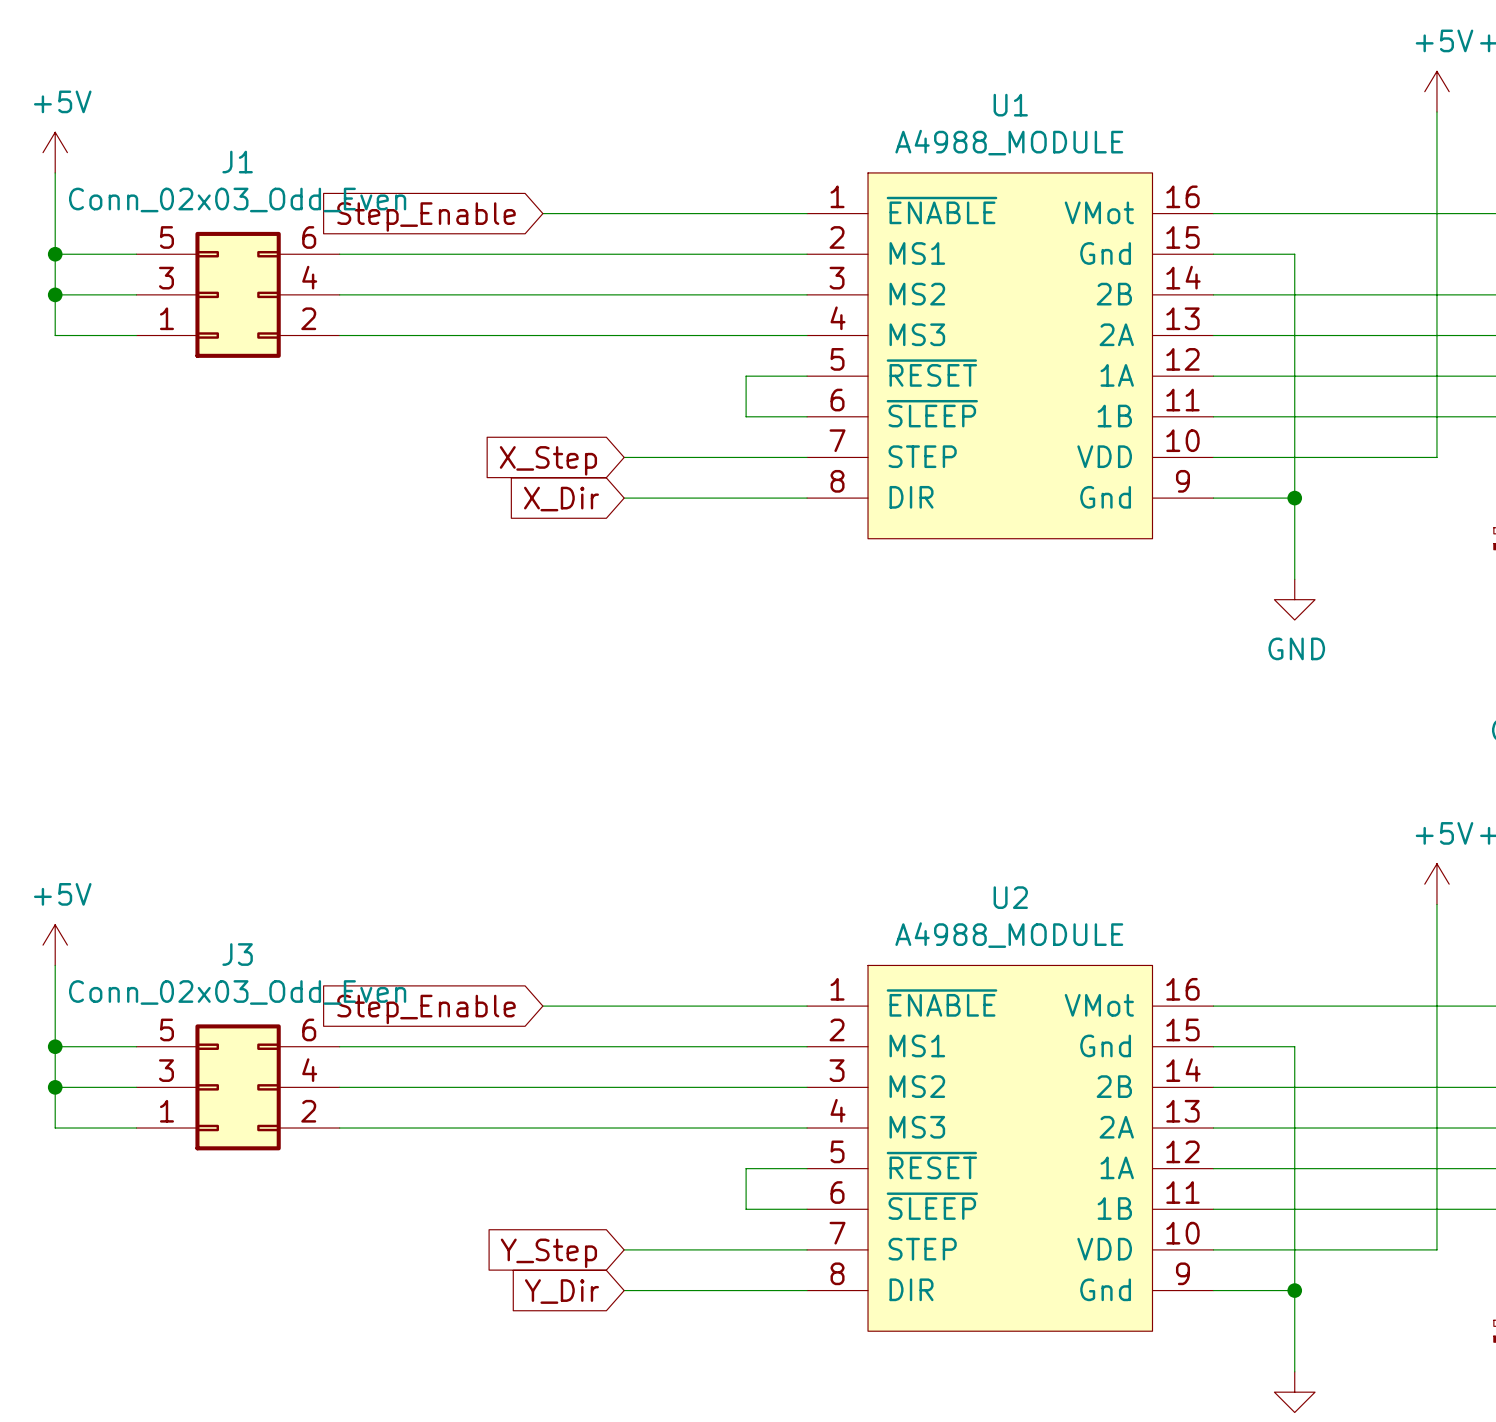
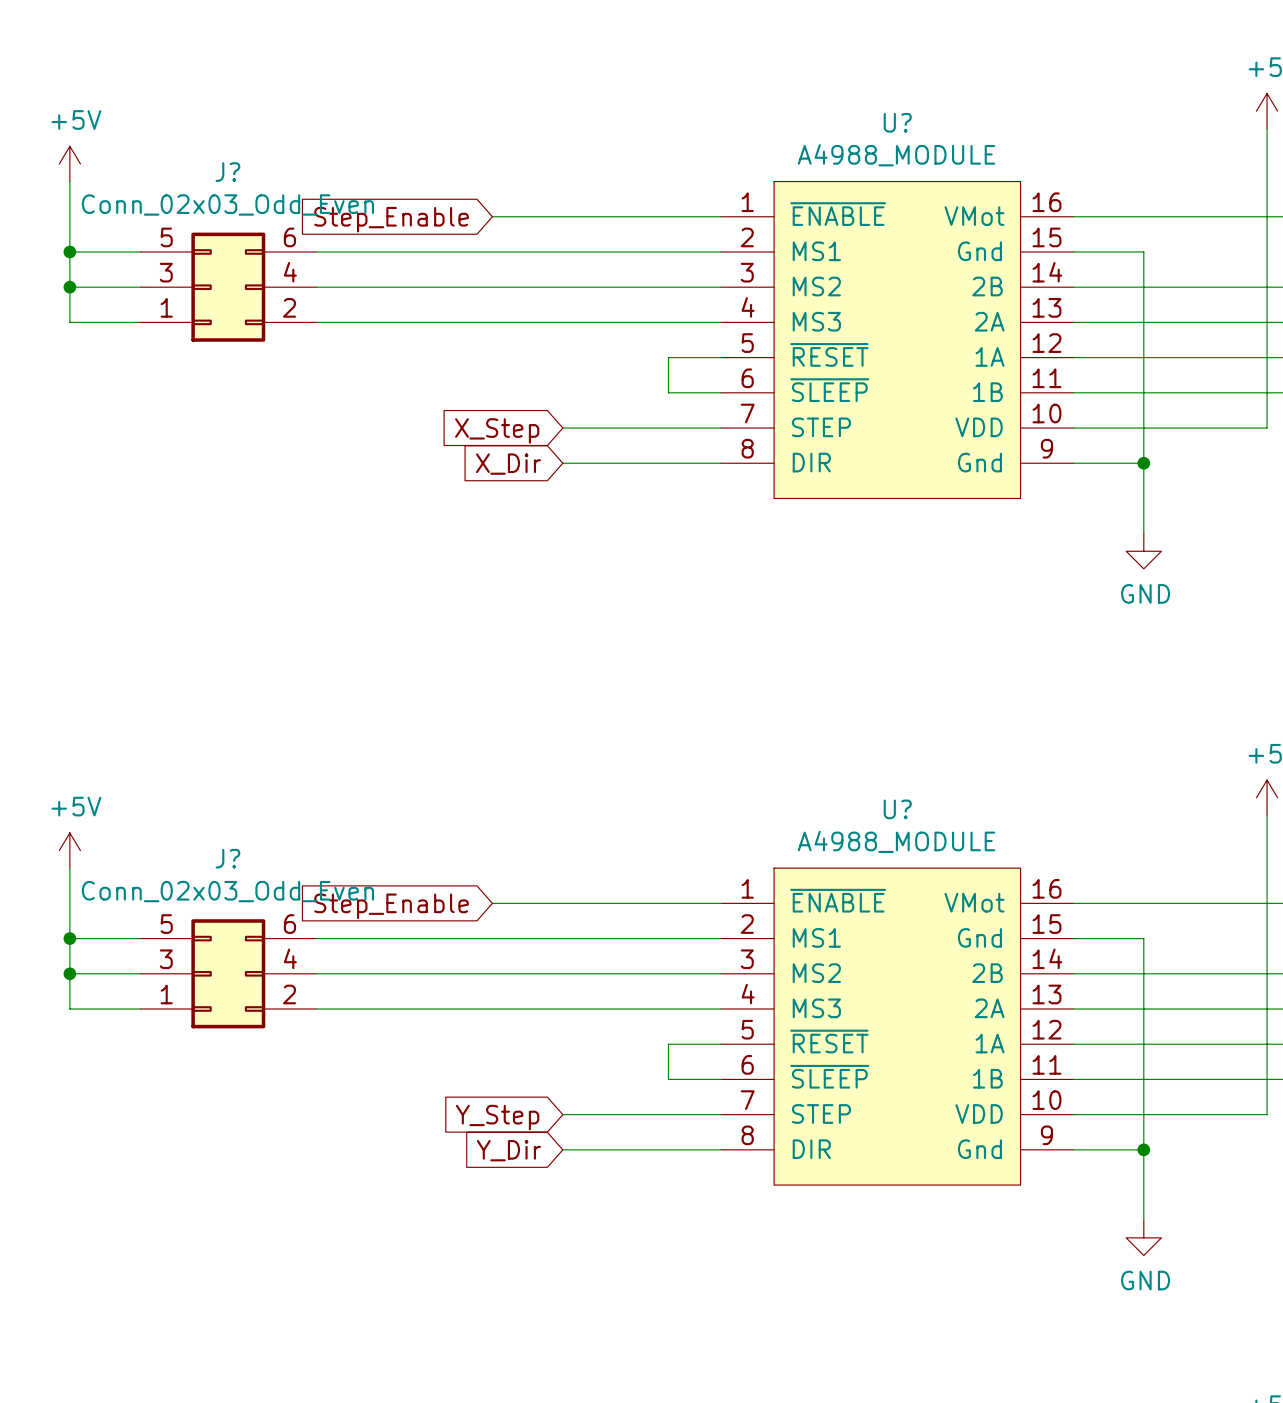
U1 name: U1 (1010, 105) -> U? (897, 122)
J1 name: J1 (237, 162) -> J? (227, 172)
U2 name: U2 (1010, 897) -> U? (897, 809)
J3 name: J3 (237, 954) -> J? (227, 858)

